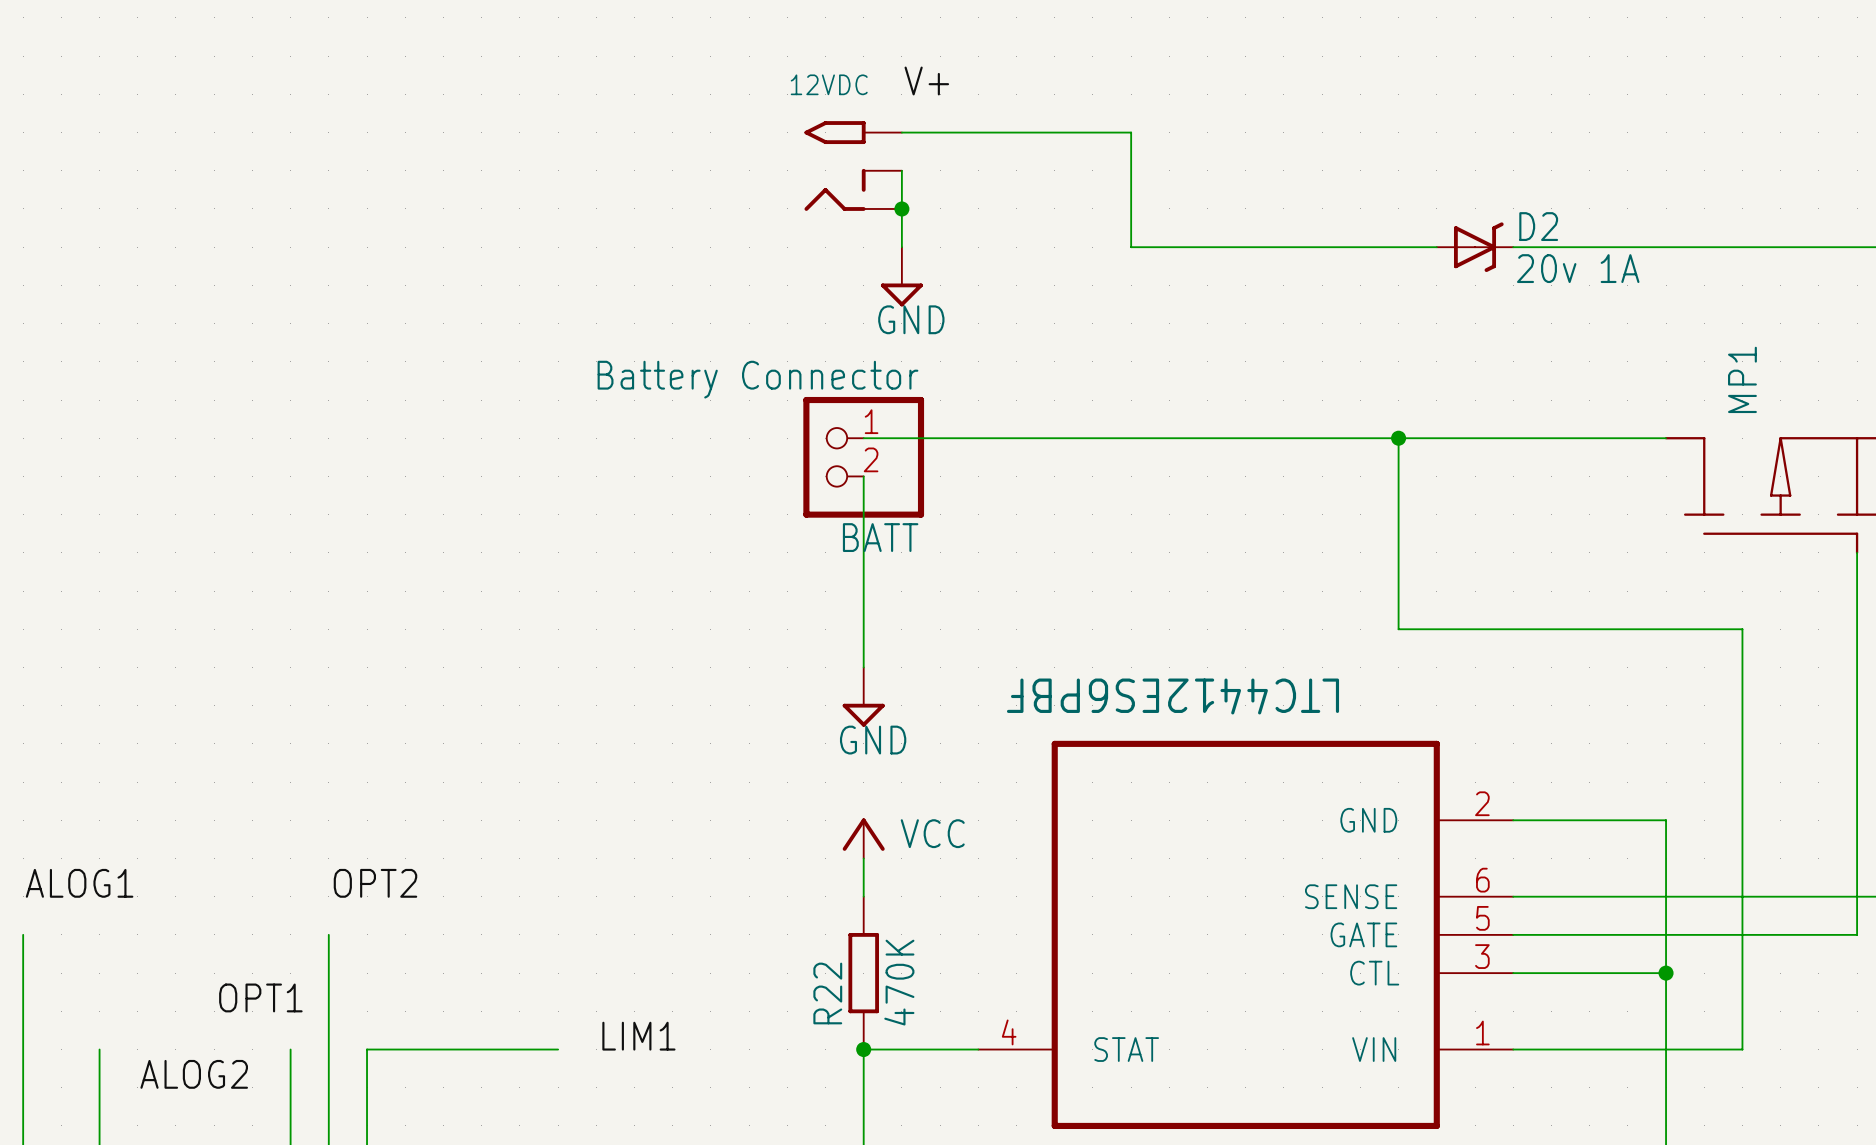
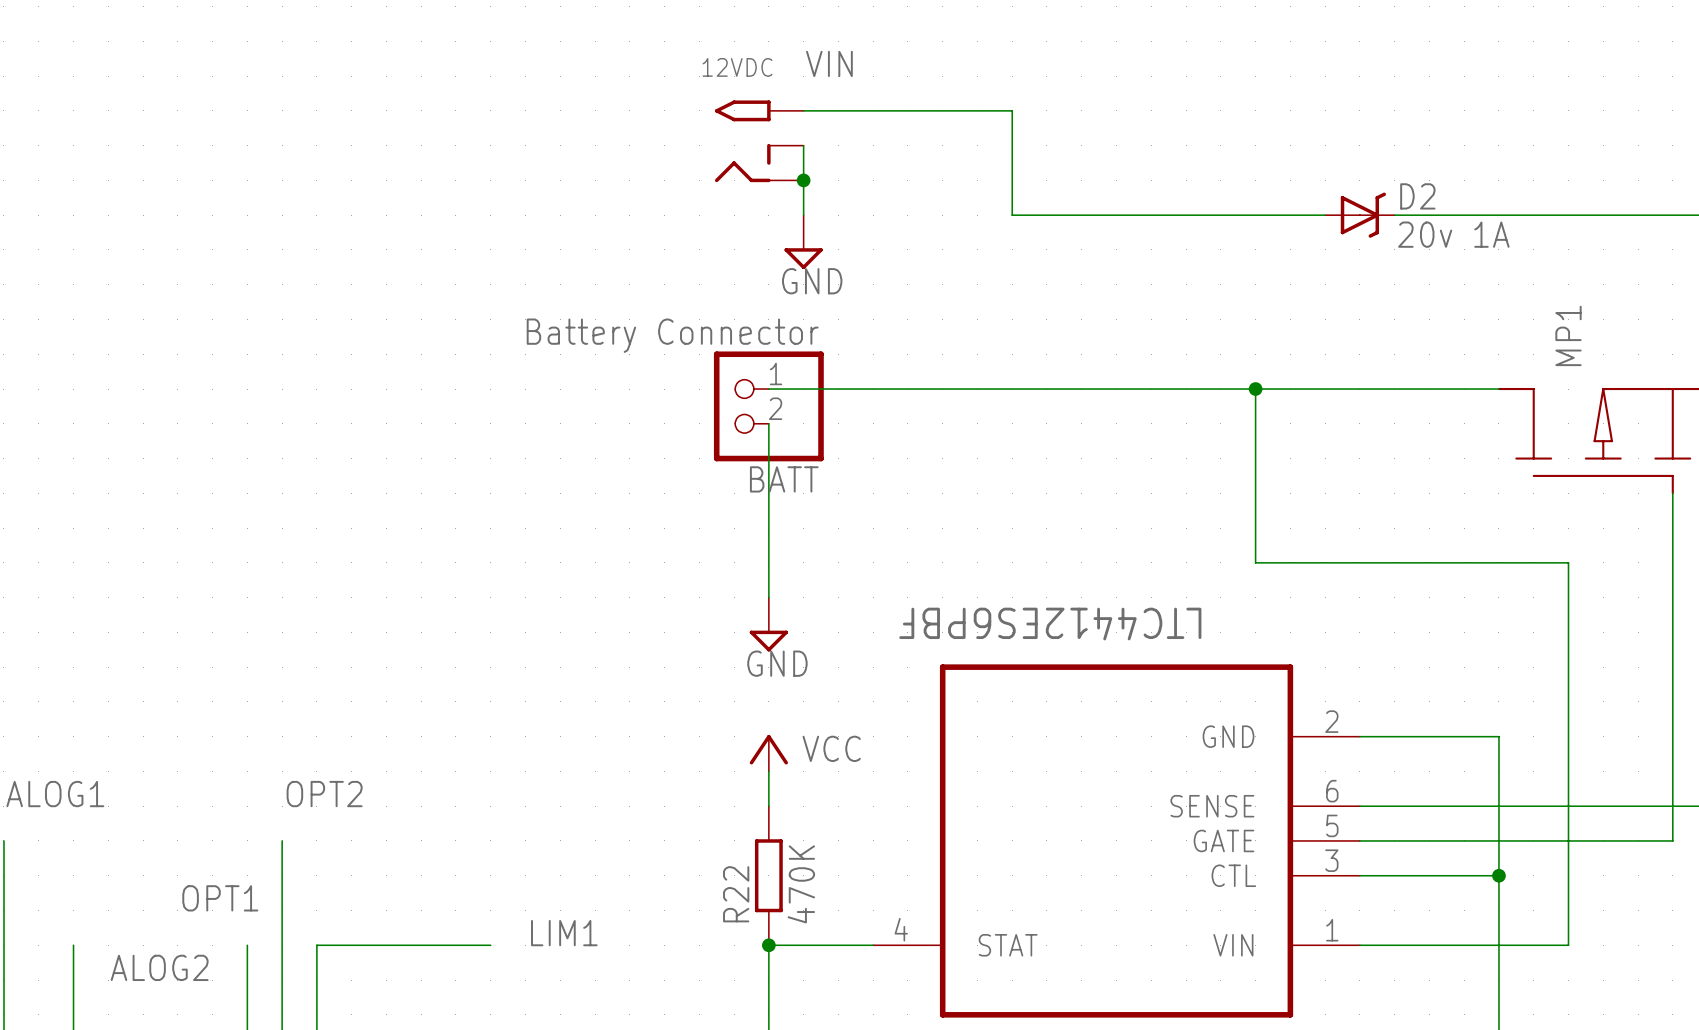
label: V+ (926, 80) -> VIN (829, 63)
D2 position: (1475, 247) -> (1359, 215)

